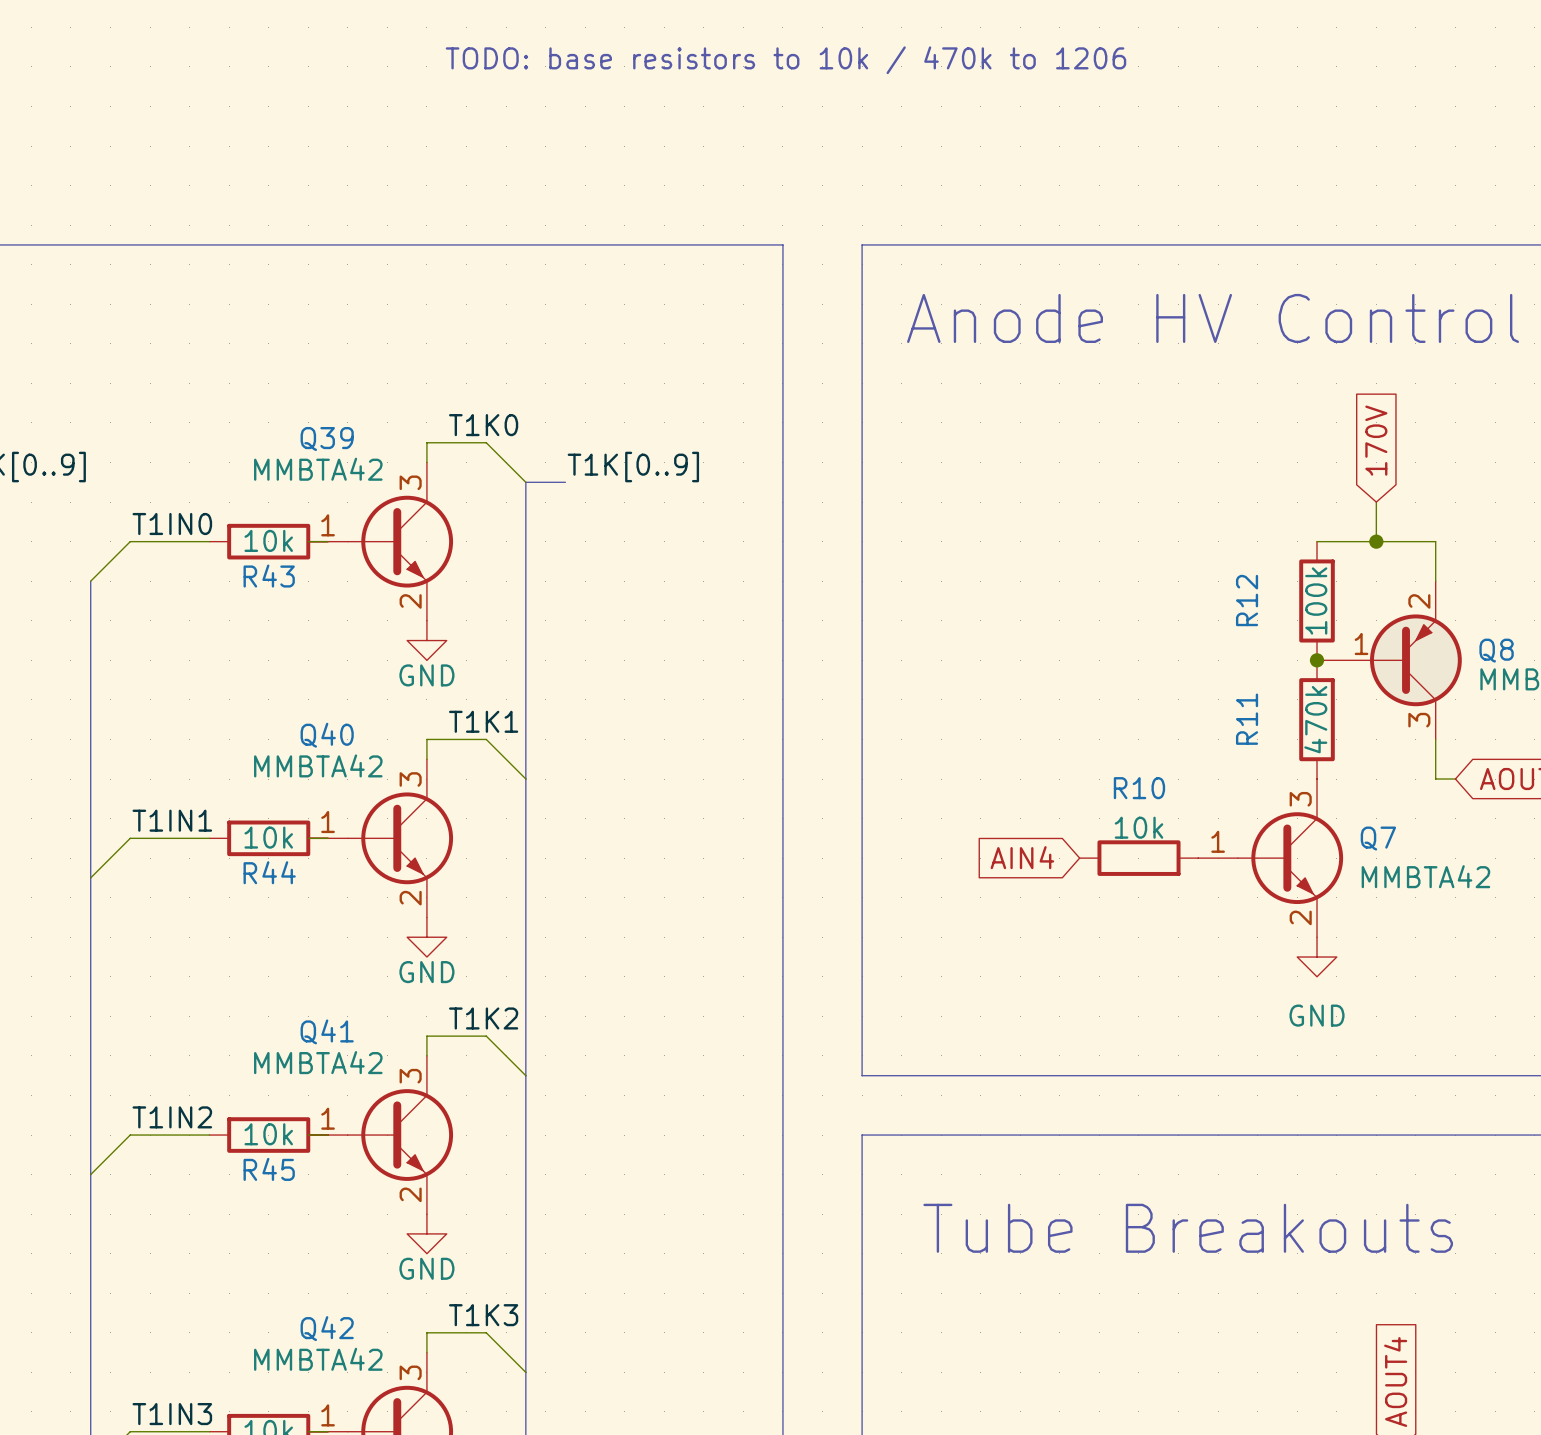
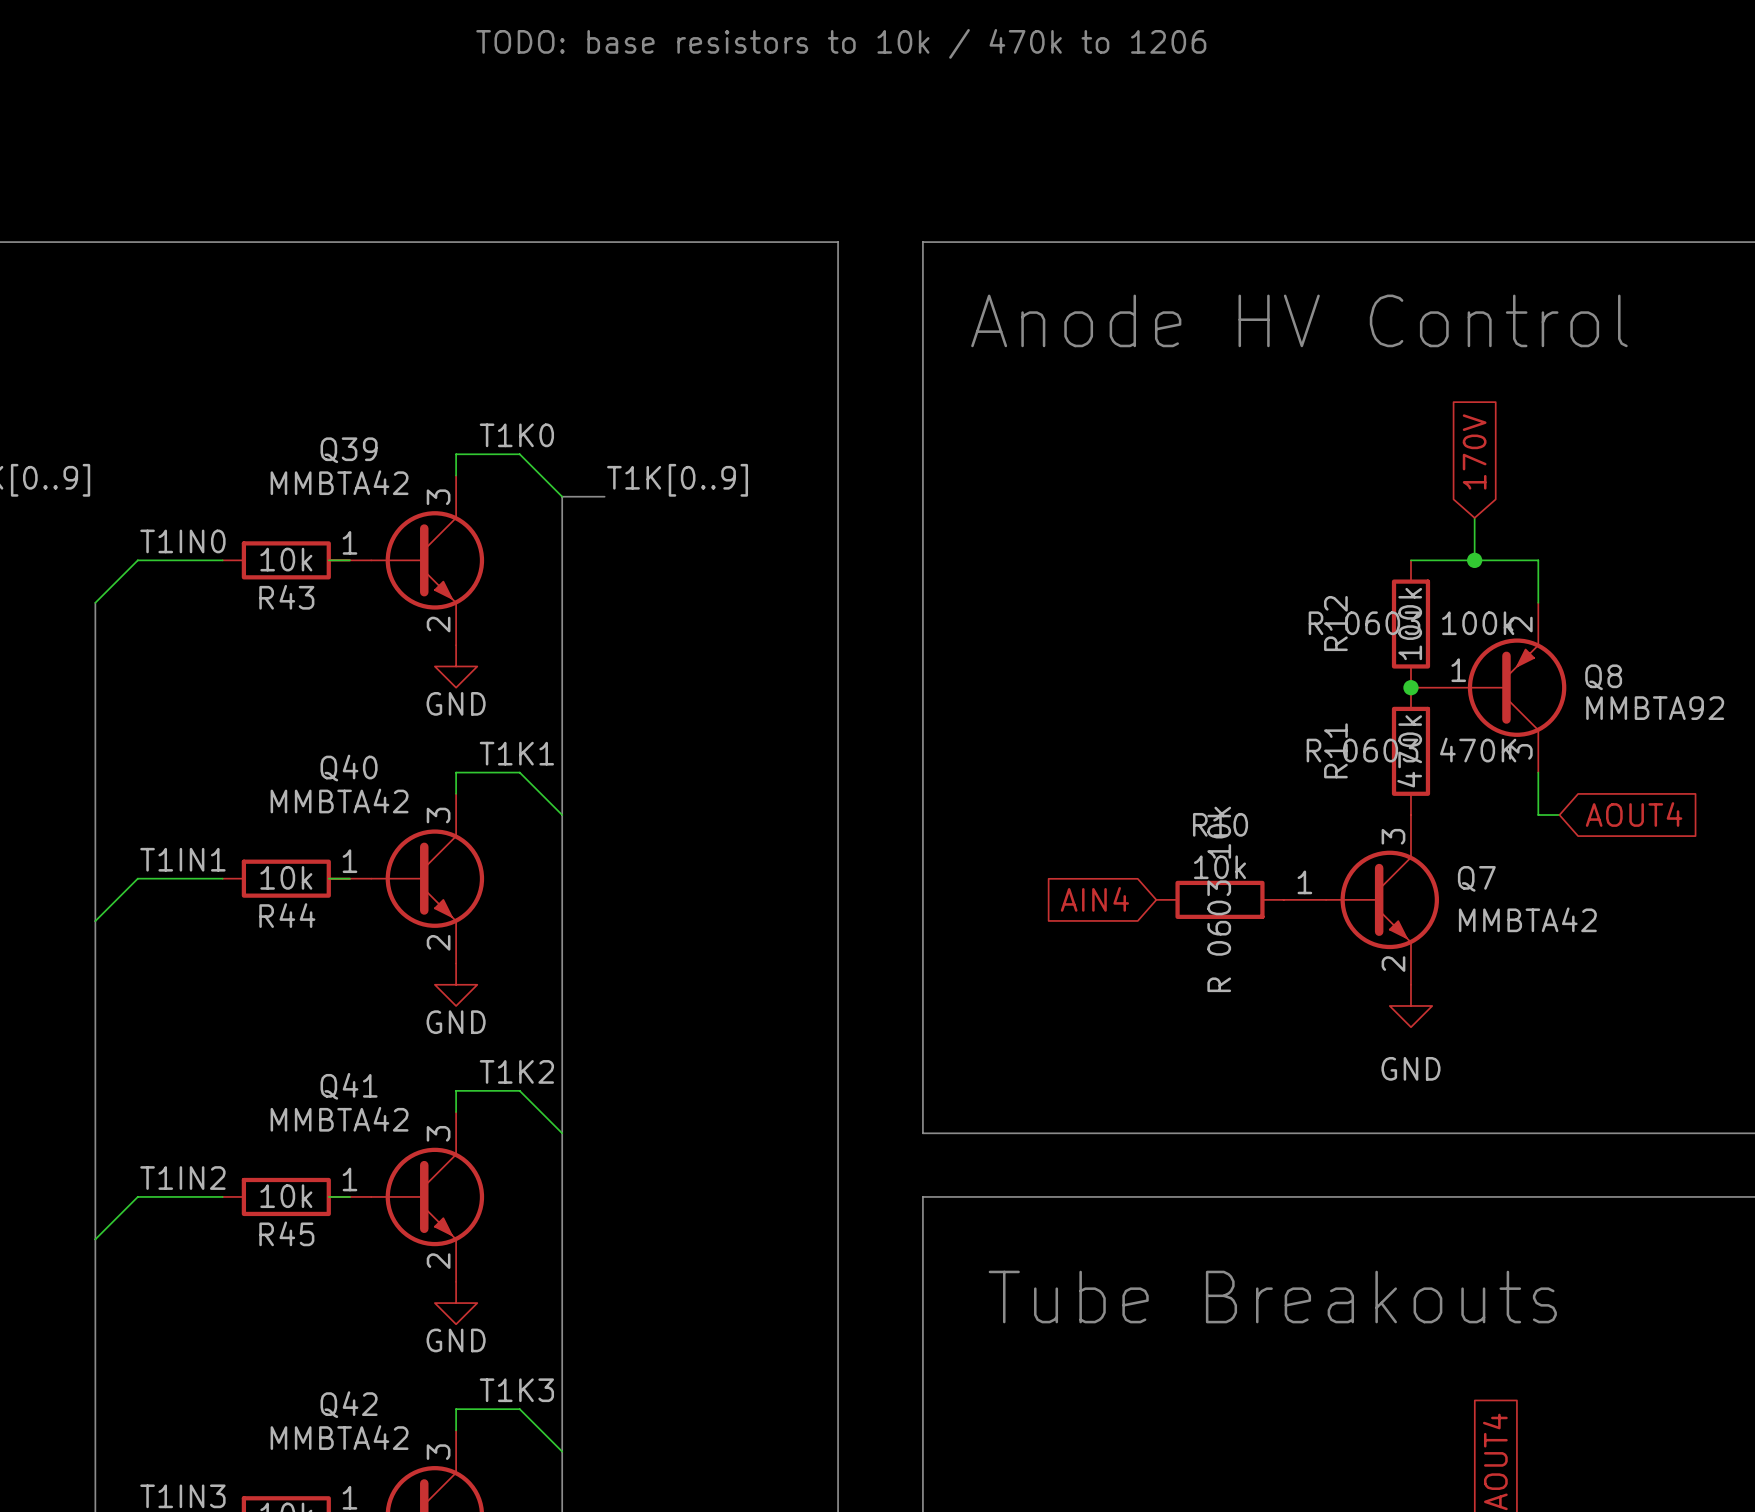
R12 text: none -> R 0603 100k (1411, 623)
R11 text: none -> R 0603 470K (1411, 750)
R10 text: none -> R 0603 10k (1219, 899)

